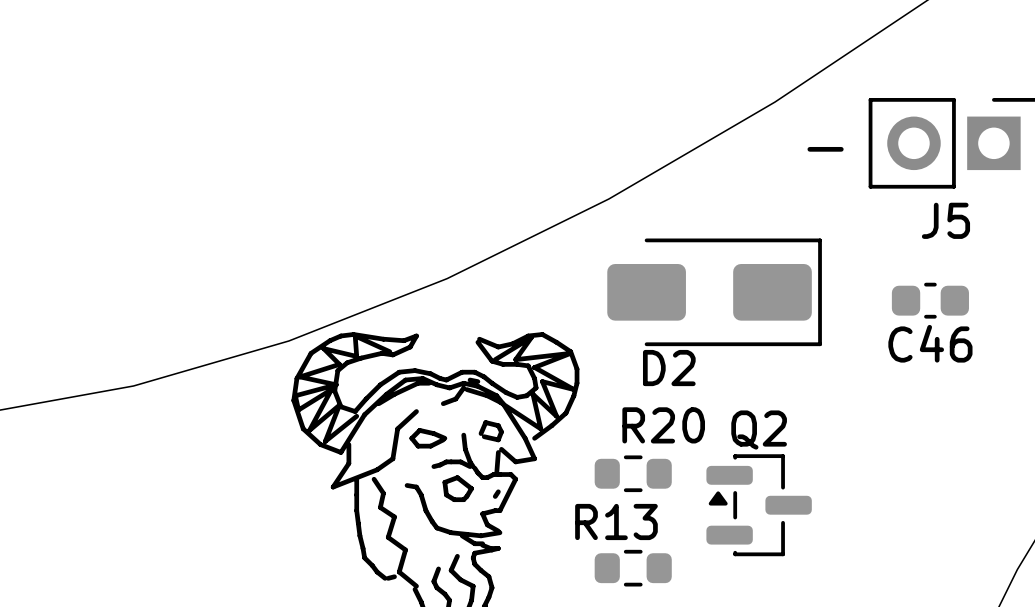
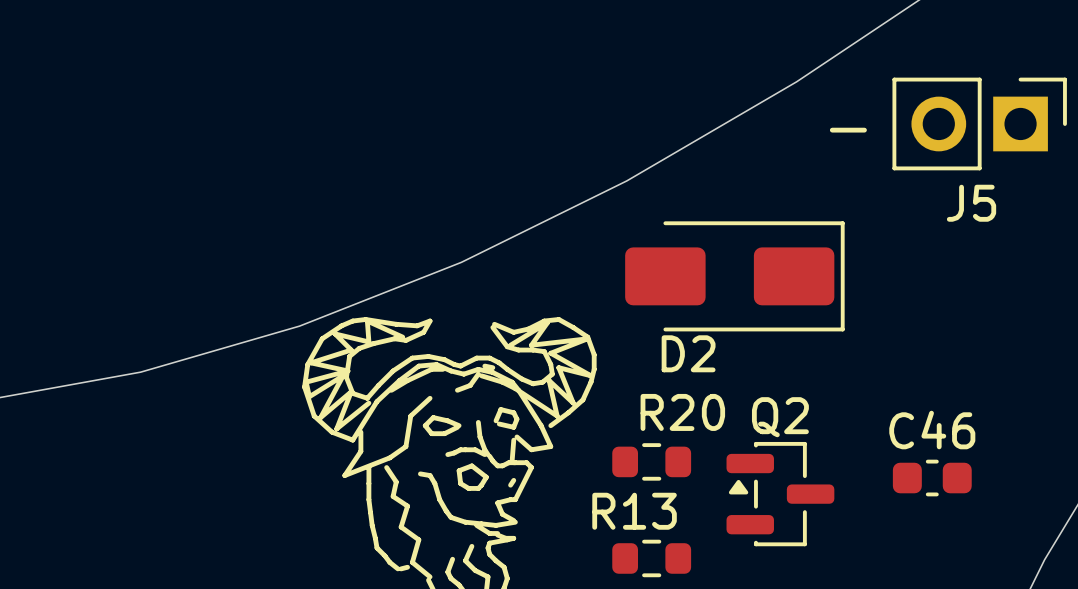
C46 position: (930, 300) -> (932, 478)
C46 name position: C46 (930, 343) -> C46 (932, 430)

